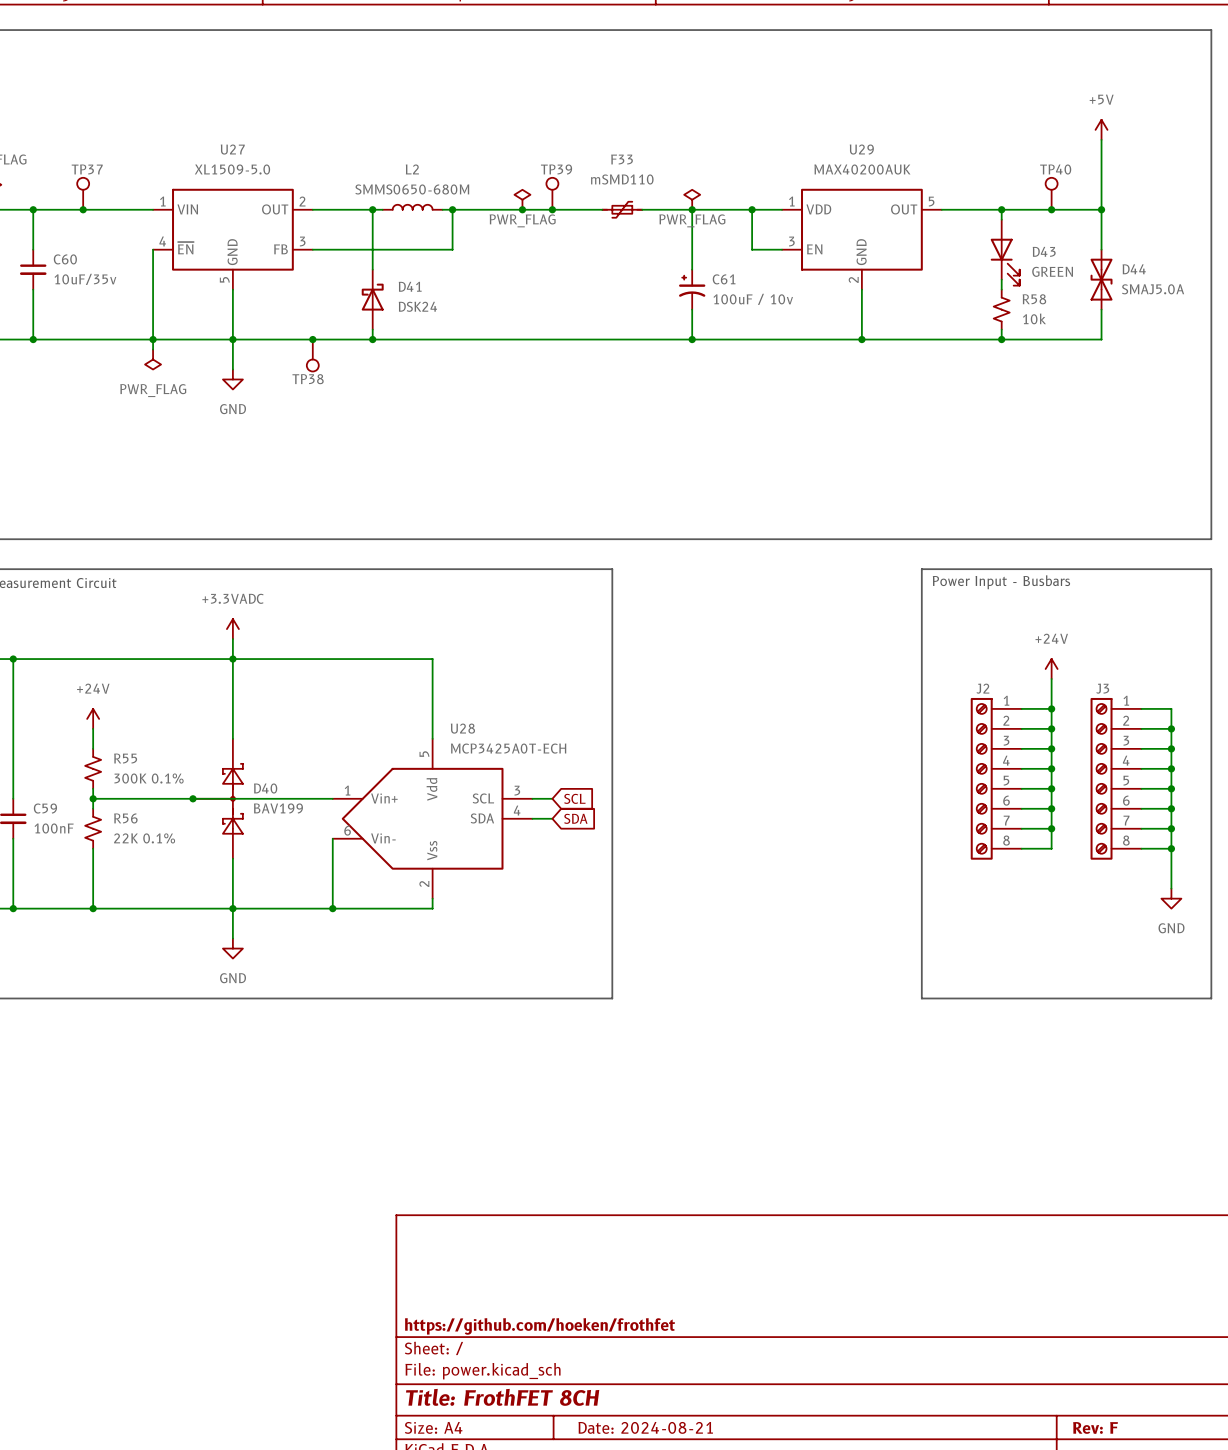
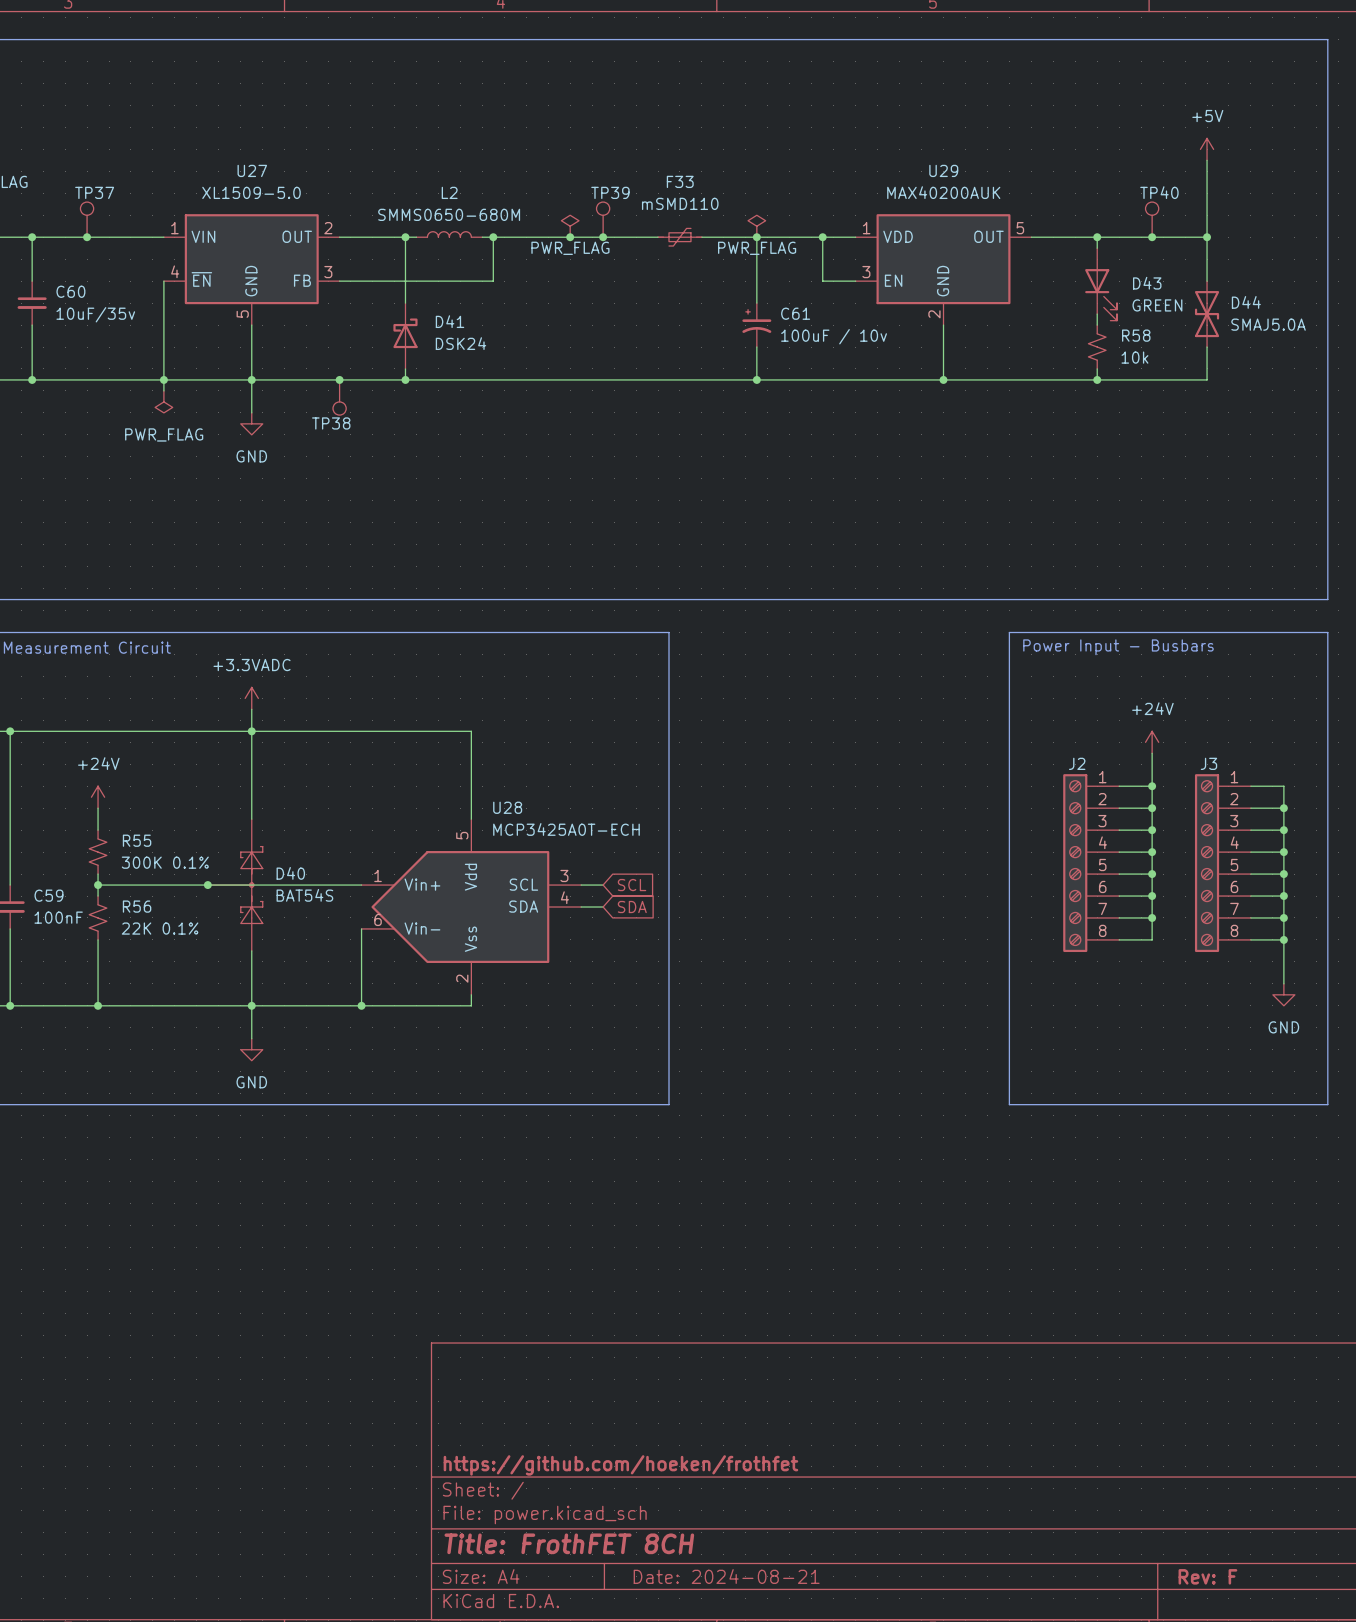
D40 value: BAV199 (278, 808) -> BAT54S (304, 895)

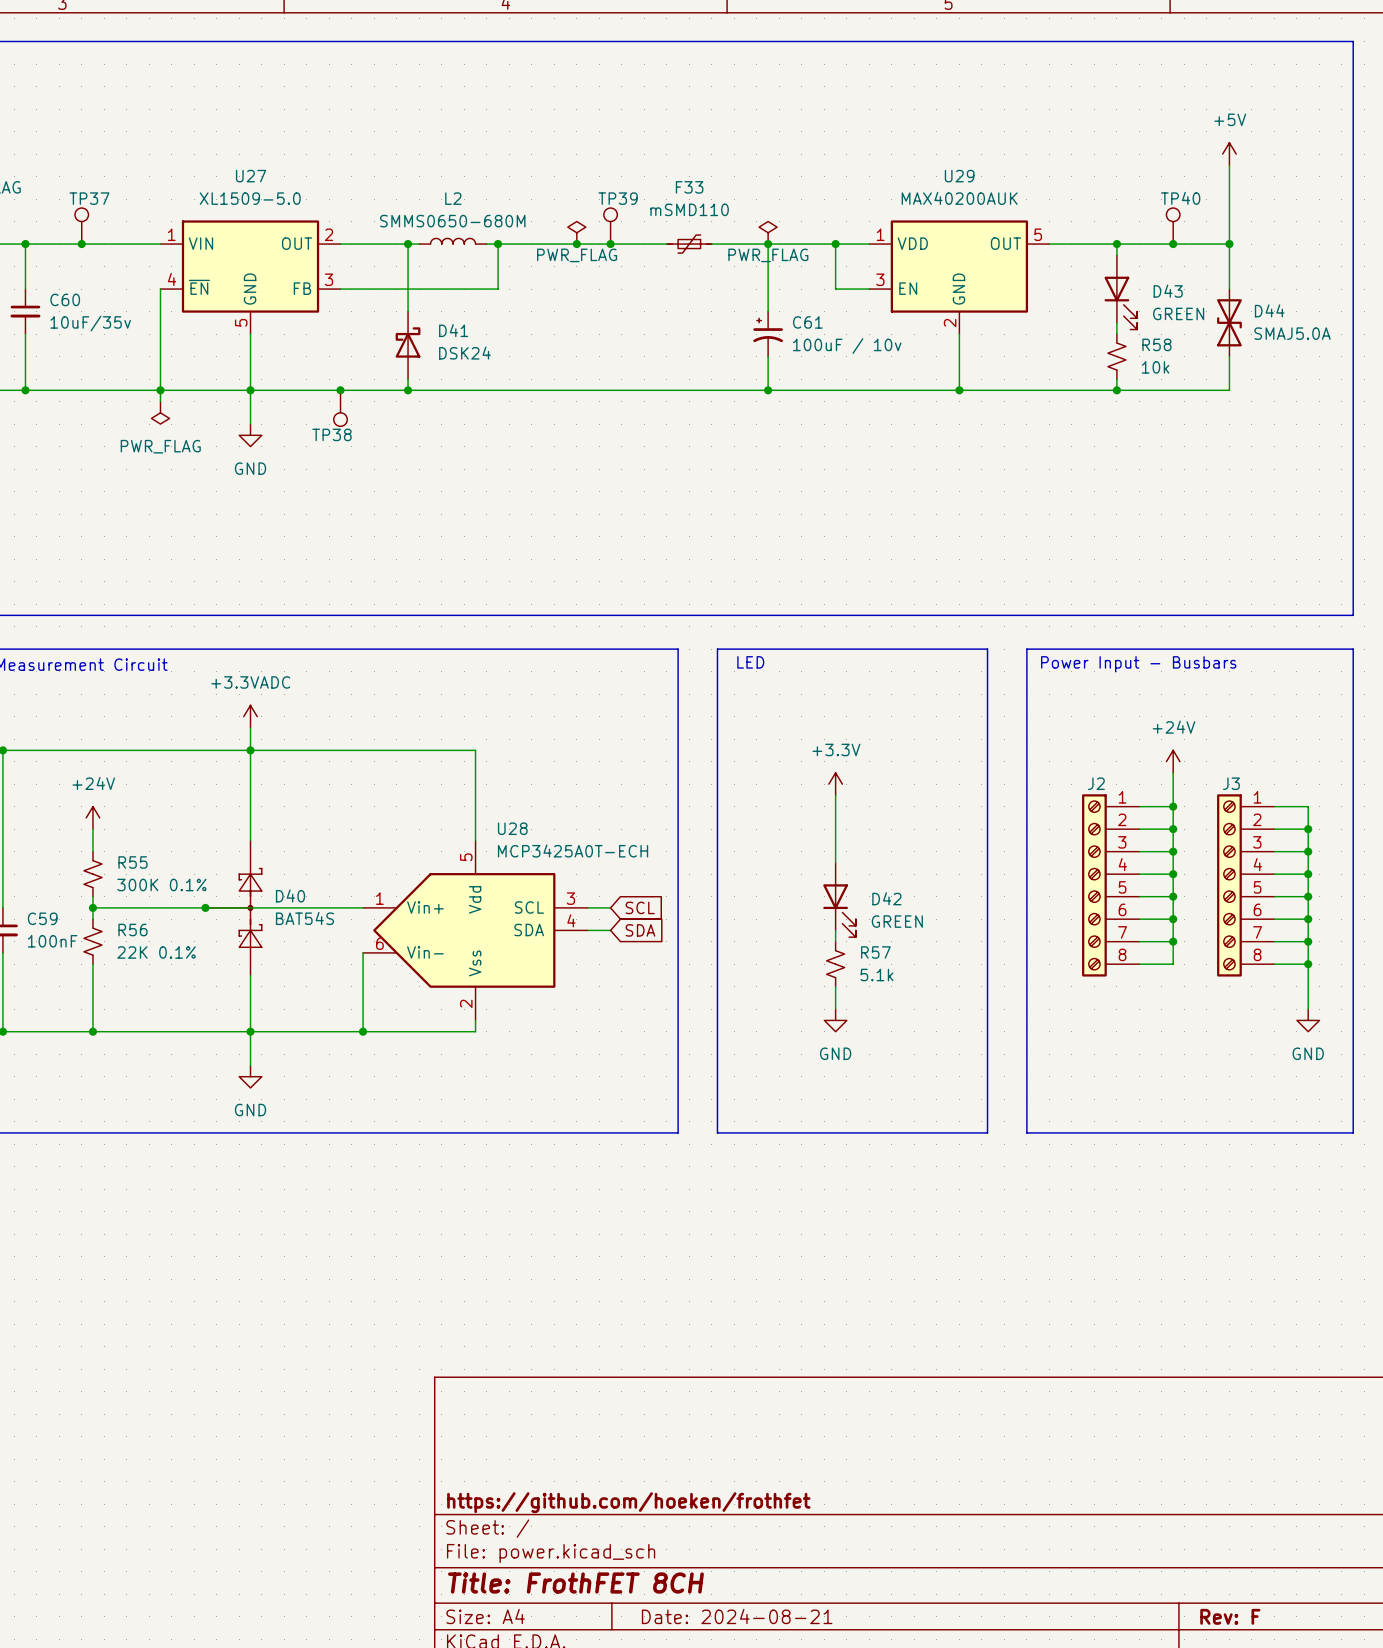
line: none -> (717, 649) (987, 649) (987, 1132) (717, 1132) (717, 649)
text: none -> LED (750, 662)
power symbol: none -> +3.3V (835, 784)
wire: none -> (835, 795) (835, 862)
D42: none -> GREEN (839, 900)
wire: none -> (835, 930) (835, 941)
R57: none -> 5.1k (835, 964)
wire: none -> (835, 986) (835, 1009)
power symbol: none -> GND (835, 1020)

